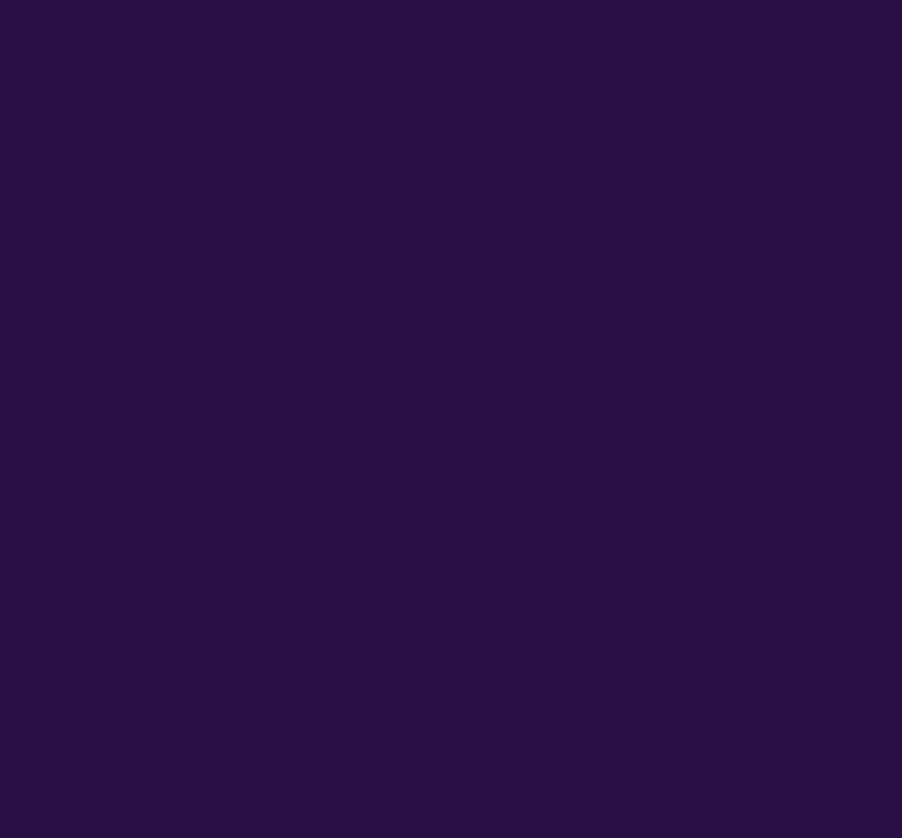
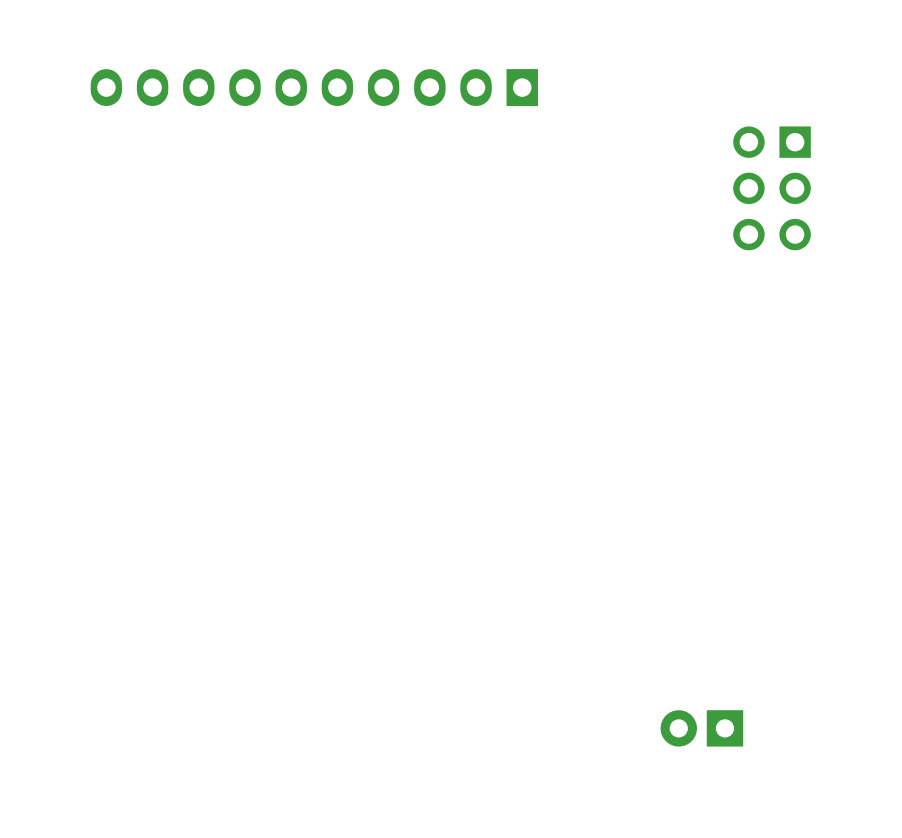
part: none -> (314, 87)
part: none -> (772, 188)
part: none -> (701, 728)

